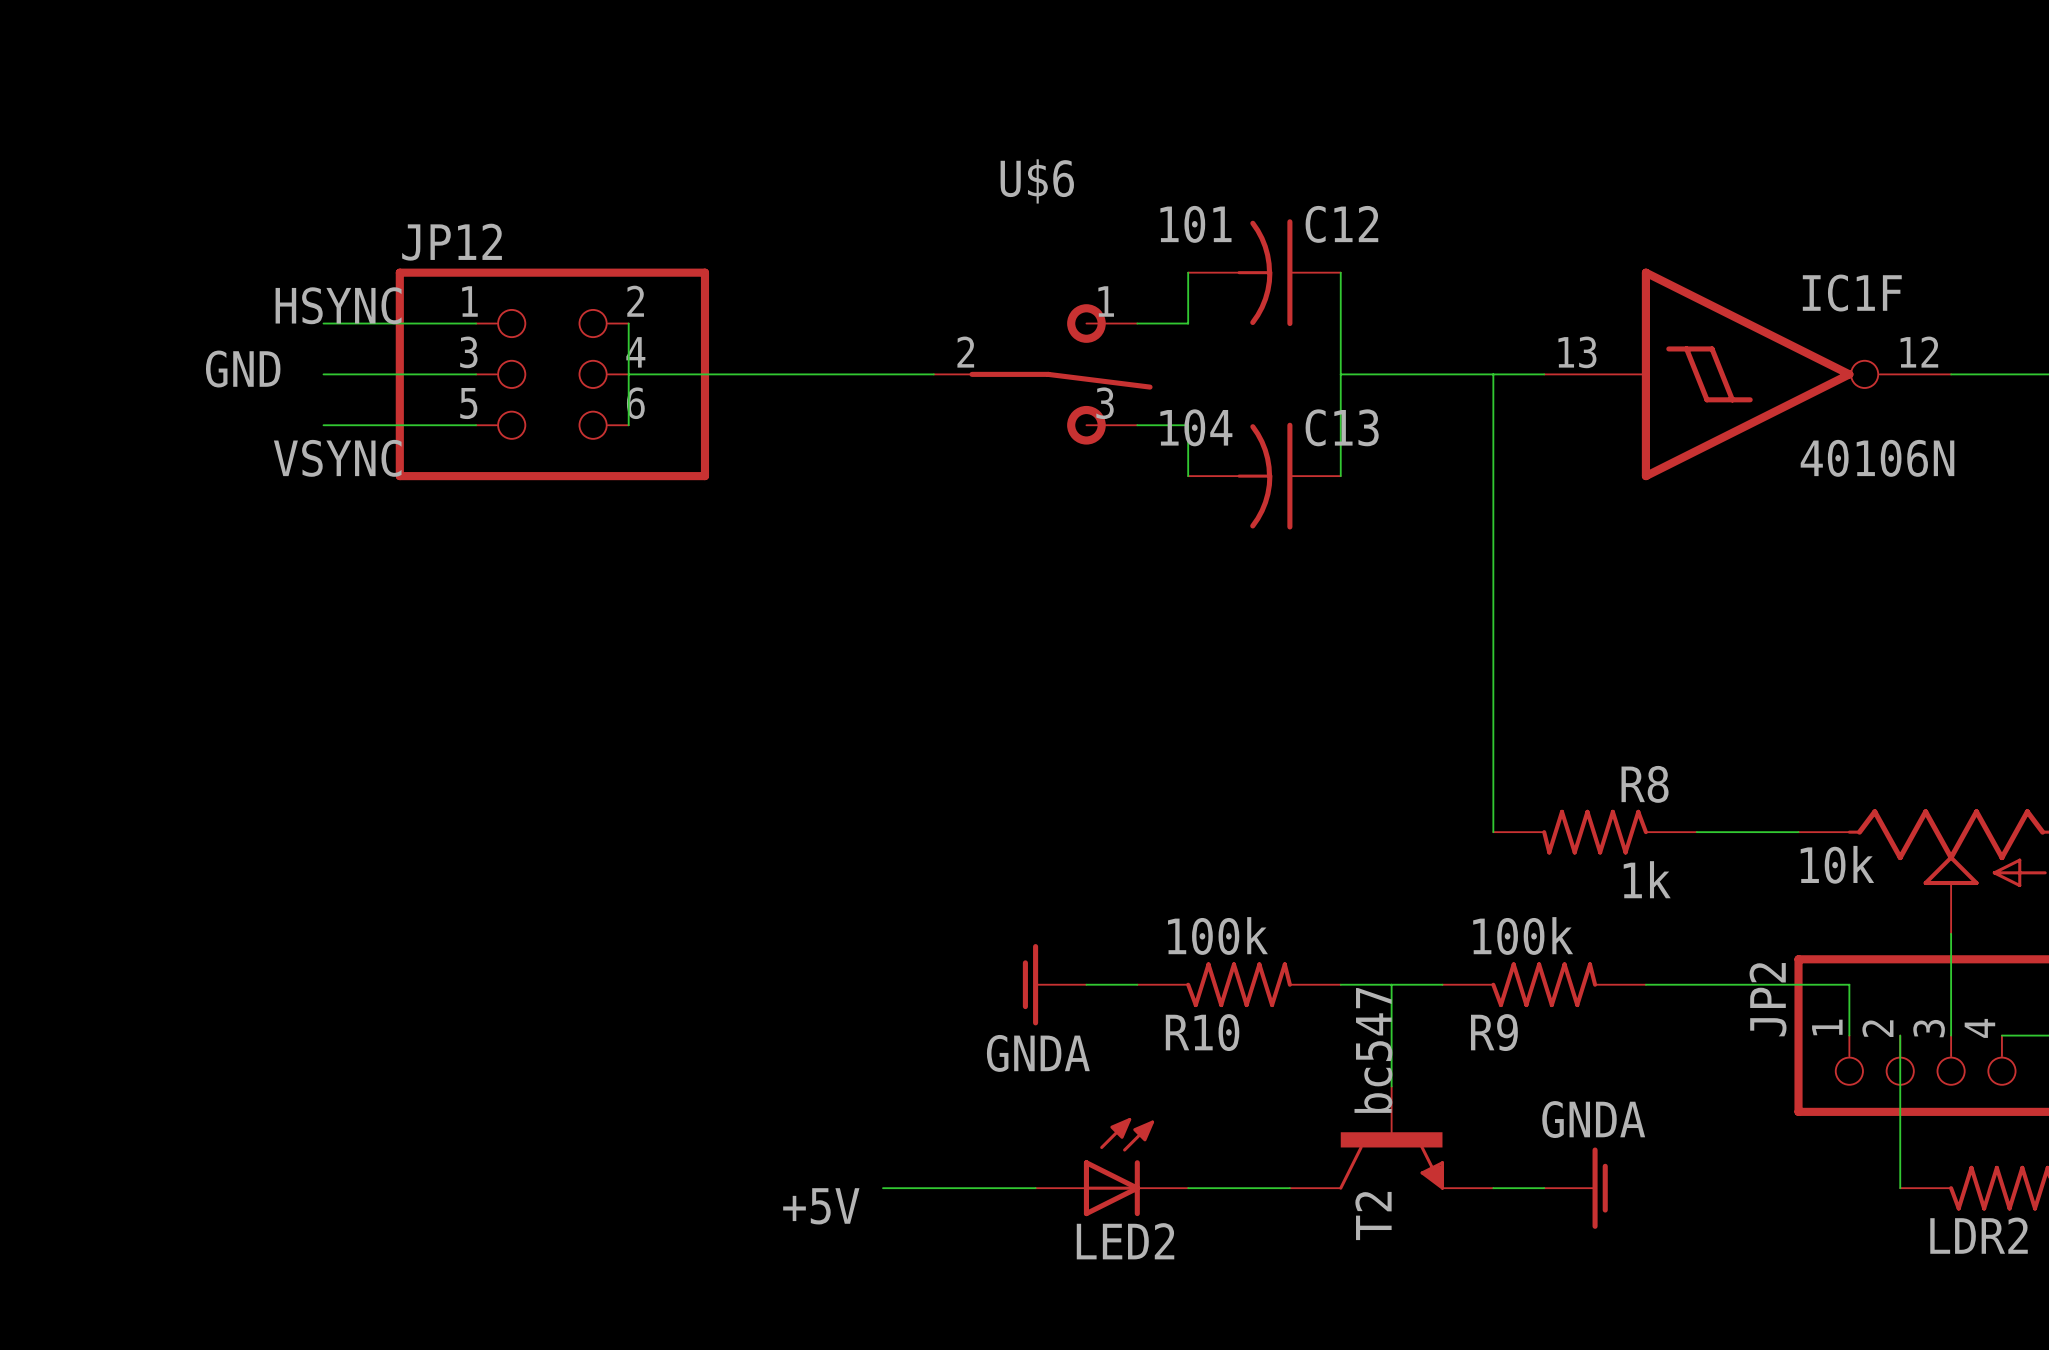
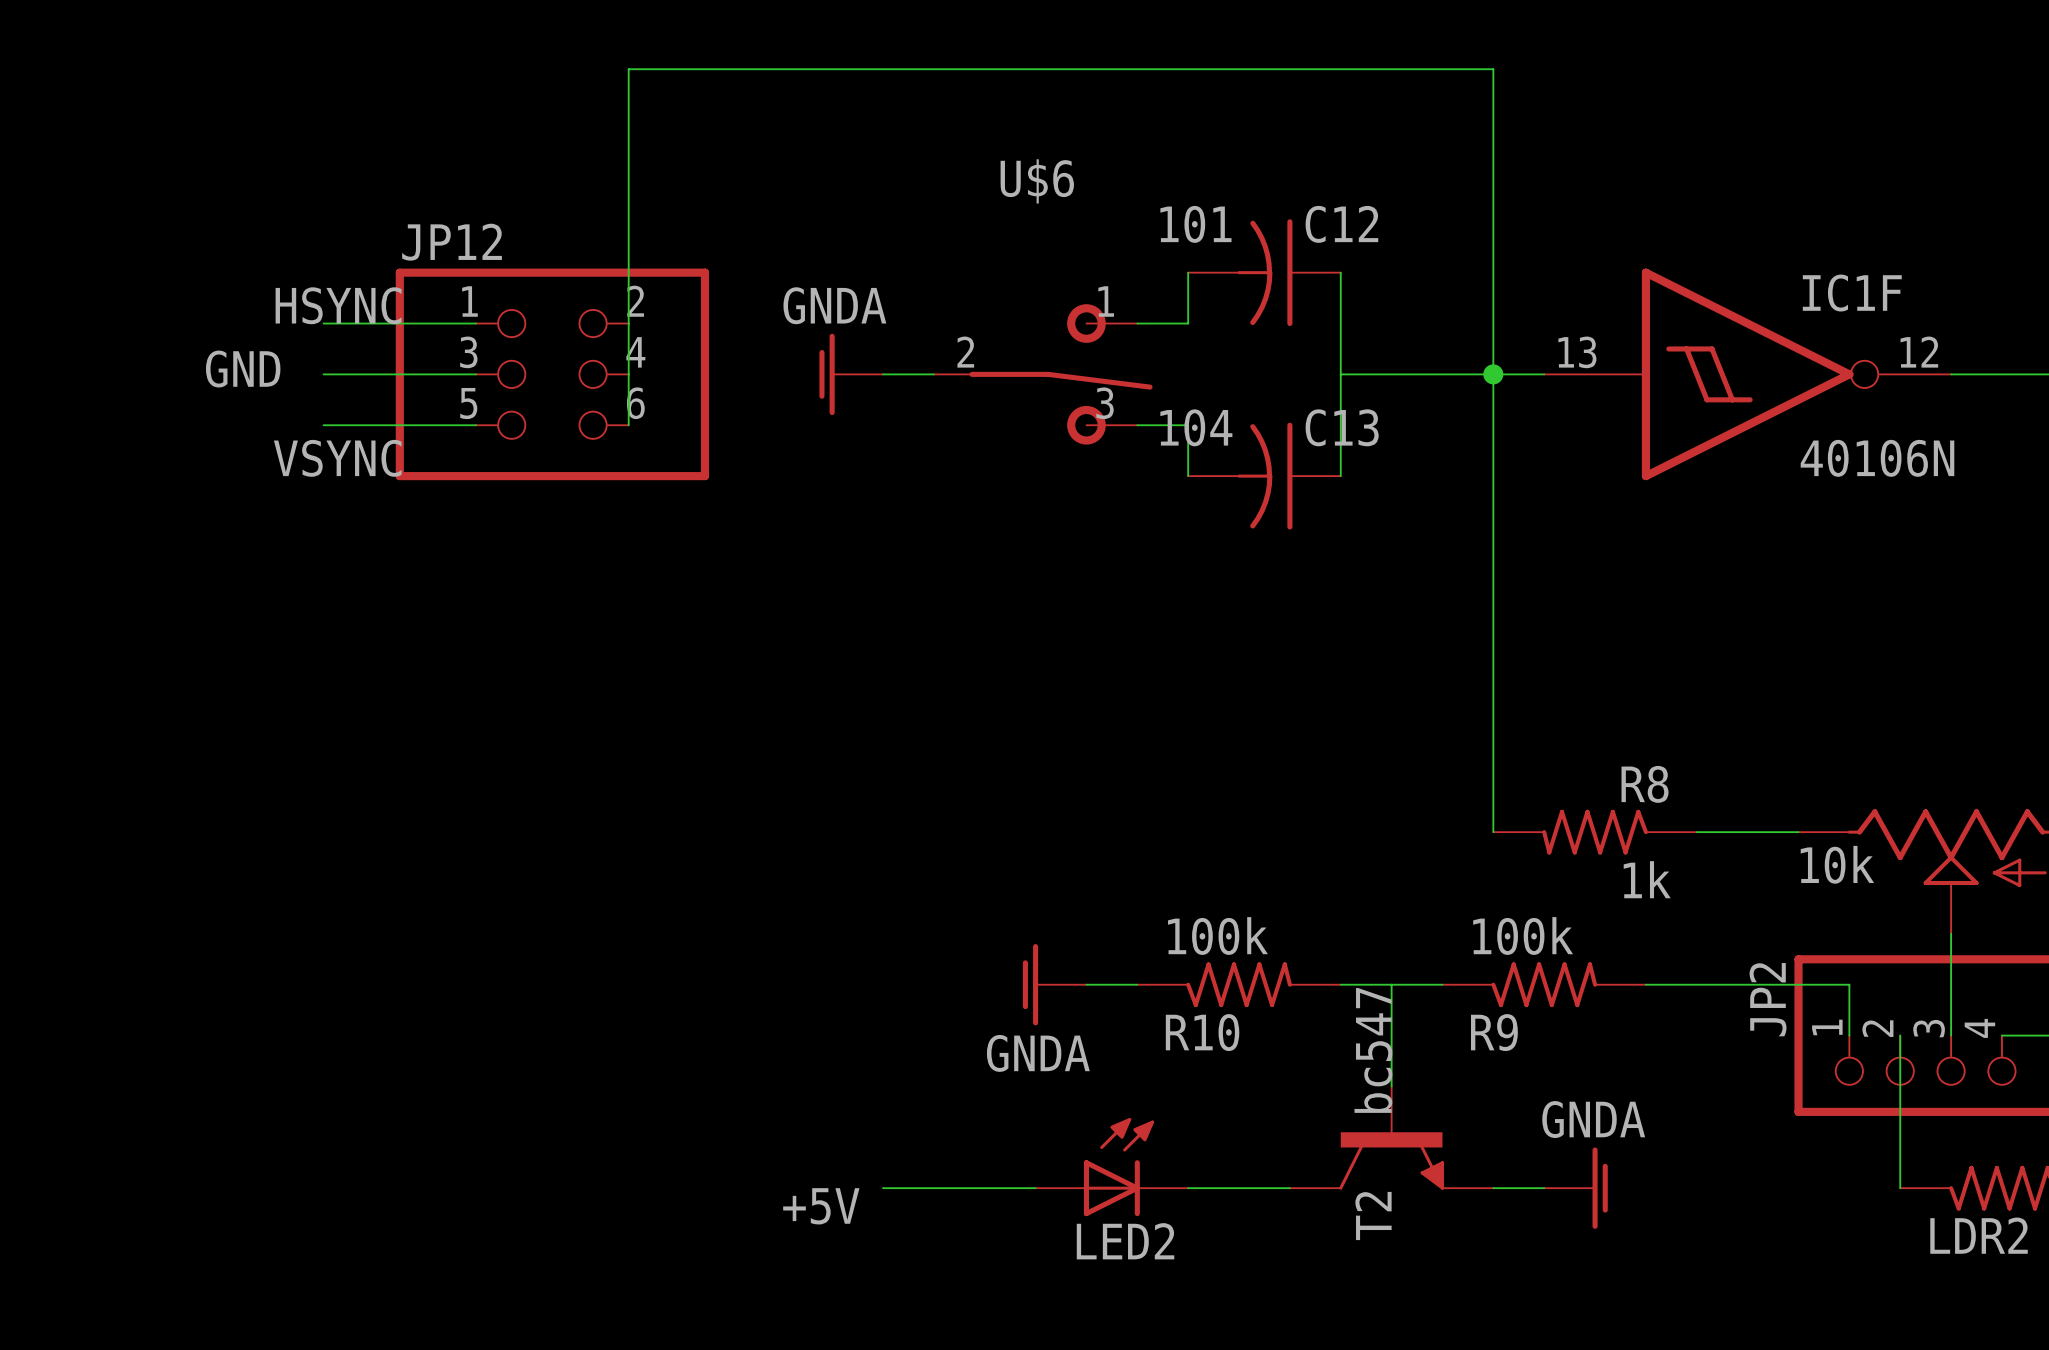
wire: none -> (628, 323) (628, 69) (1493, 69) (1493, 374)
wire: (628, 374) (883, 374) -> none
power symbol: none -> GNDA (851, 374)
junction: none -> (1493, 374)

